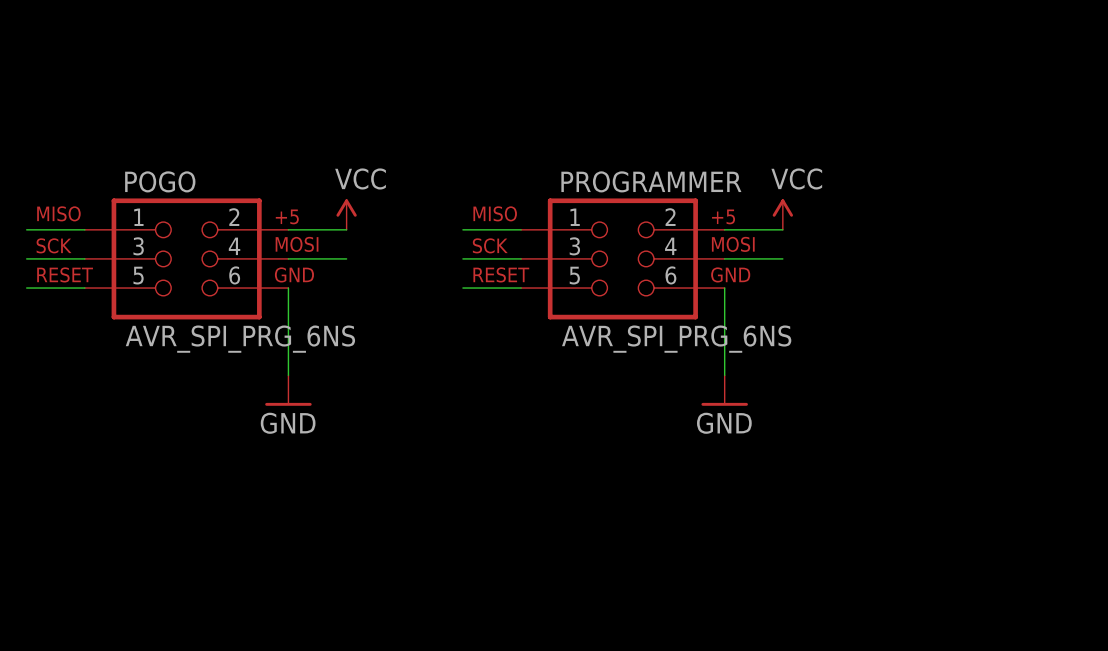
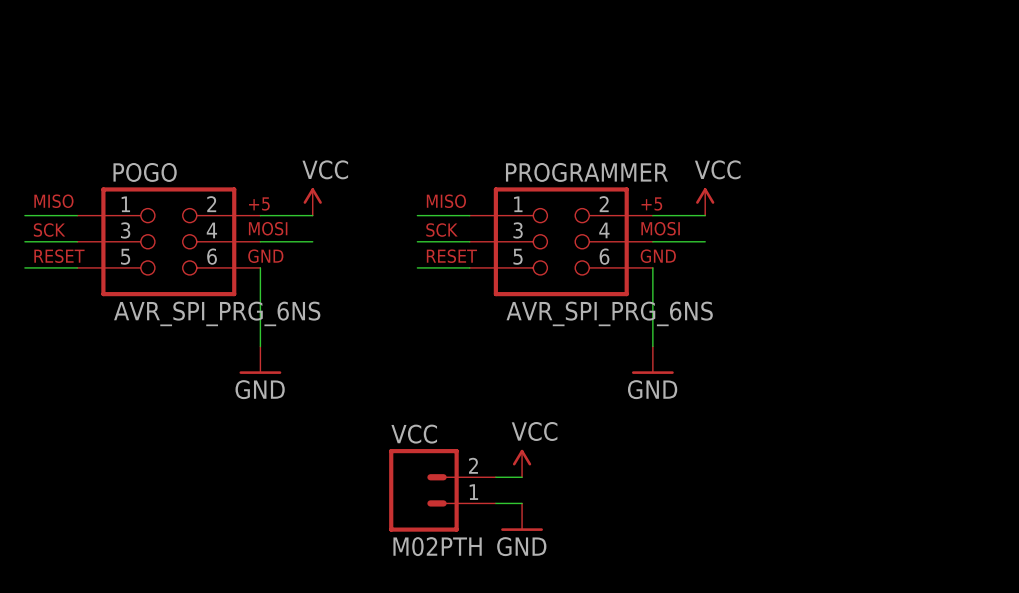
power symbol: none -> VCC (522, 463)
wire: none -> (495, 477) (522, 477)
VCC: none -> M02PTH (442, 490)
wire: none -> (495, 503) (522, 503)
power symbol: none -> GND (522, 517)

